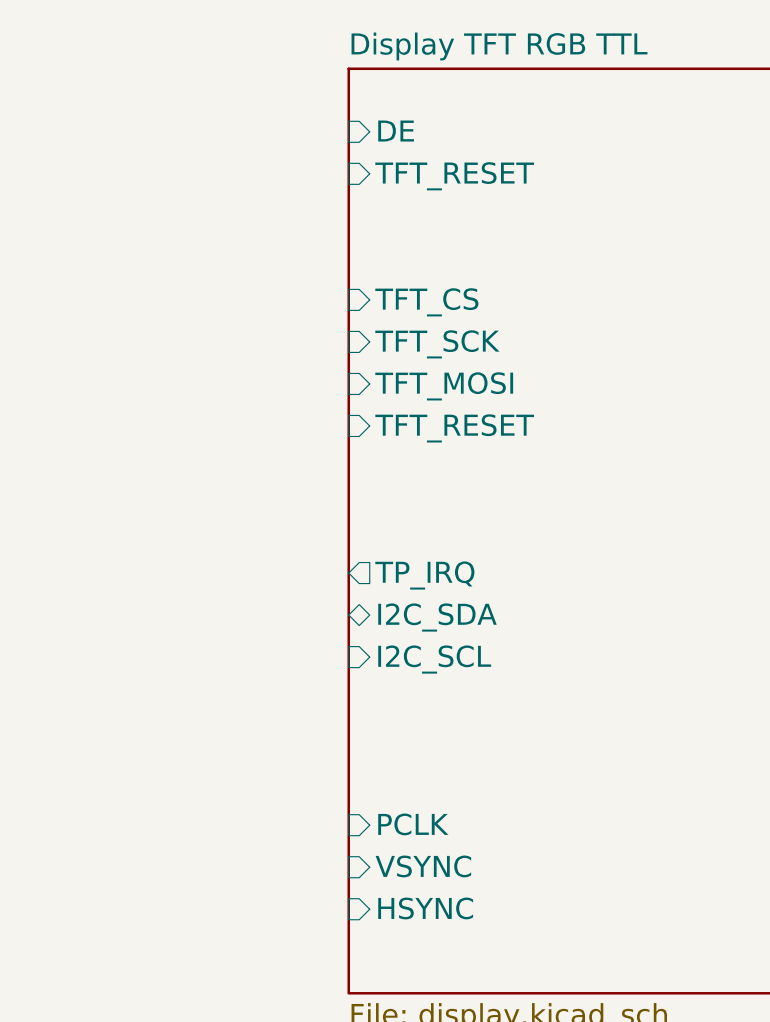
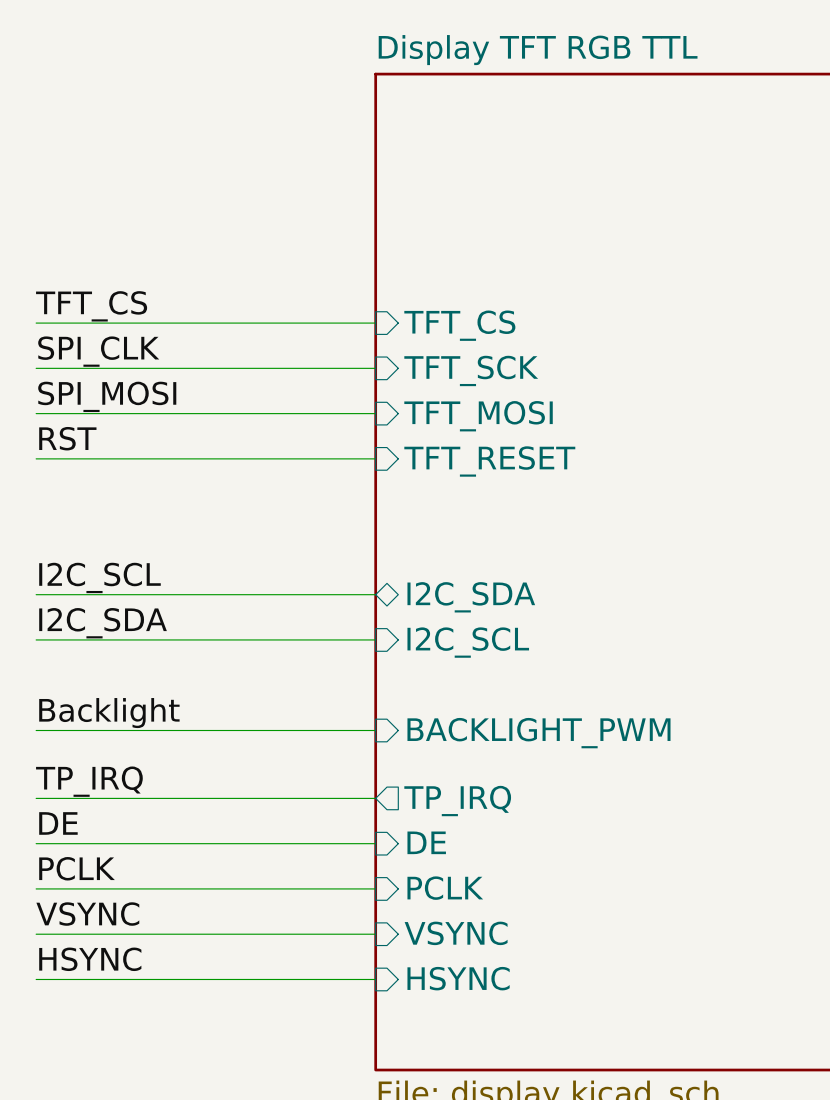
sheet pin: DE (396, 131) -> none
sheet pin: TFT_RESET (454, 176) -> none
label: none -> TFT_CS (91, 306)
wire: none -> (36, 323) (375, 323)
label: none -> SPI_CLK (98, 351)
wire: none -> (36, 368) (375, 368)
label: none -> SPI_MOSI (107, 396)
wire: none -> (36, 413) (375, 413)
label: none -> RST (67, 438)
wire: none -> (36, 458) (375, 458)
label: none -> I2C_SCL (99, 577)
wire: none -> (36, 594) (375, 594)
sheet pin position: TP_IRQ (424, 575) -> TP_IRQ (457, 801)
label: none -> I2C_SDA (103, 623)
wire: none -> (36, 639) (375, 639)
sheet pin position: I2C_SDA (437, 617) -> I2C_SDA (471, 597)
sheet pin position: I2C_SCL (434, 659) -> I2C_SCL (468, 642)
label: none -> Backlight (109, 713)
wire: none -> (36, 730) (375, 730)
sheet pin: none -> BACKLIGHT_PWM (538, 733)
label: none -> TP_IRQ (89, 781)
wire: none -> (36, 798) (375, 798)
label: none -> DE (58, 823)
sheet pin: none -> DE (426, 842)
wire: none -> (36, 843) (375, 843)
label: none -> PCLK (77, 868)
wire: none -> (36, 888) (375, 888)
label: none -> VSYNC (87, 914)
wire: none -> (36, 934) (375, 934)
label: none -> HSYNC (90, 959)
wire: none -> (36, 979) (375, 979)

